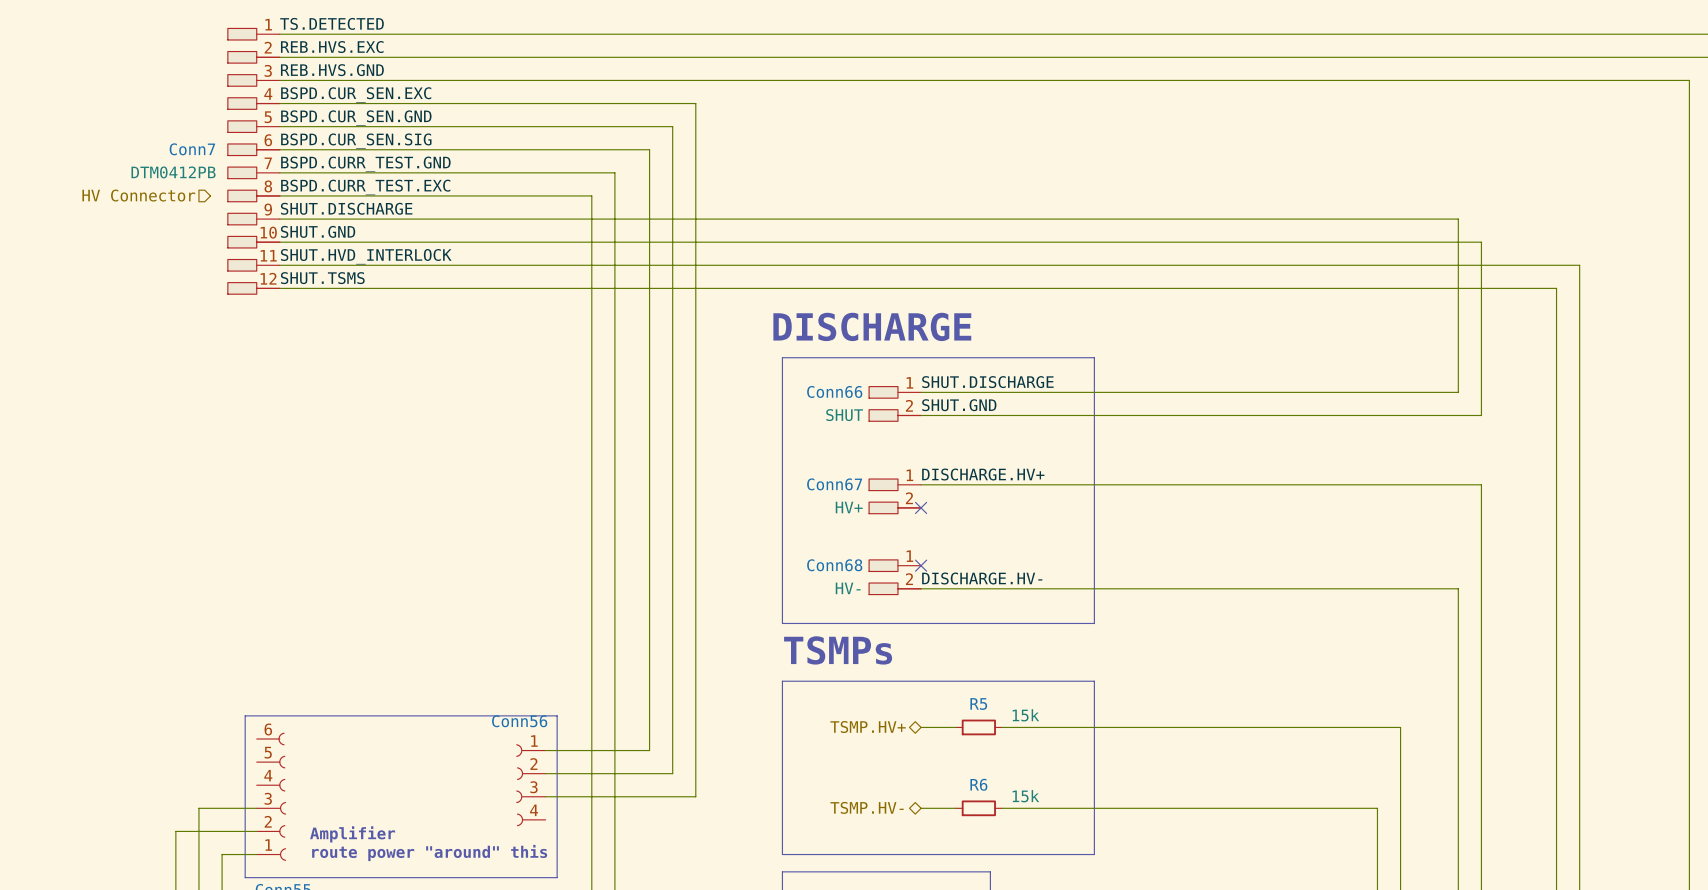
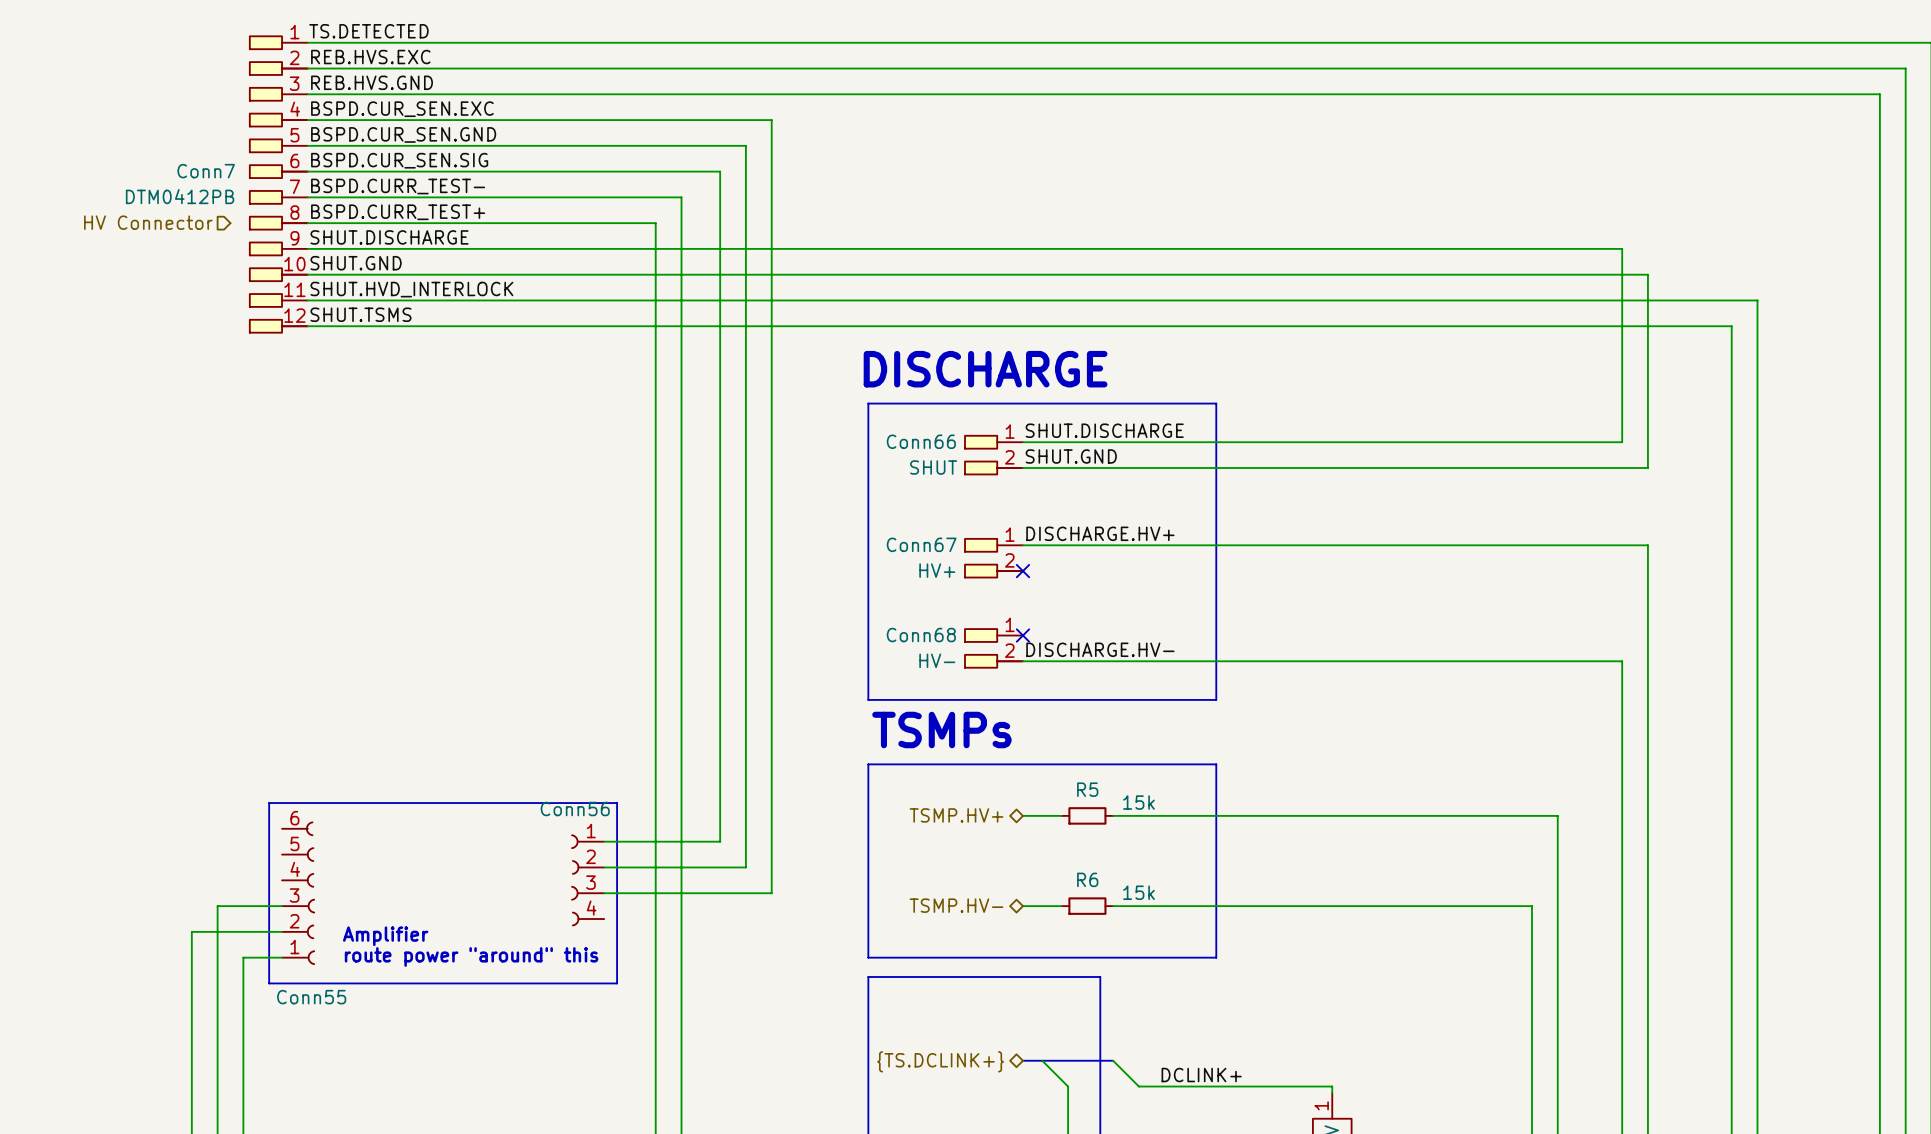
label: BSPD.CURR_TEST.GND (365, 164) -> BSPD.CURR_TEST- (398, 186)
label: BSPD.CURR_TEST.EXC (365, 187) -> BSPD.CURR_TEST+ (398, 212)

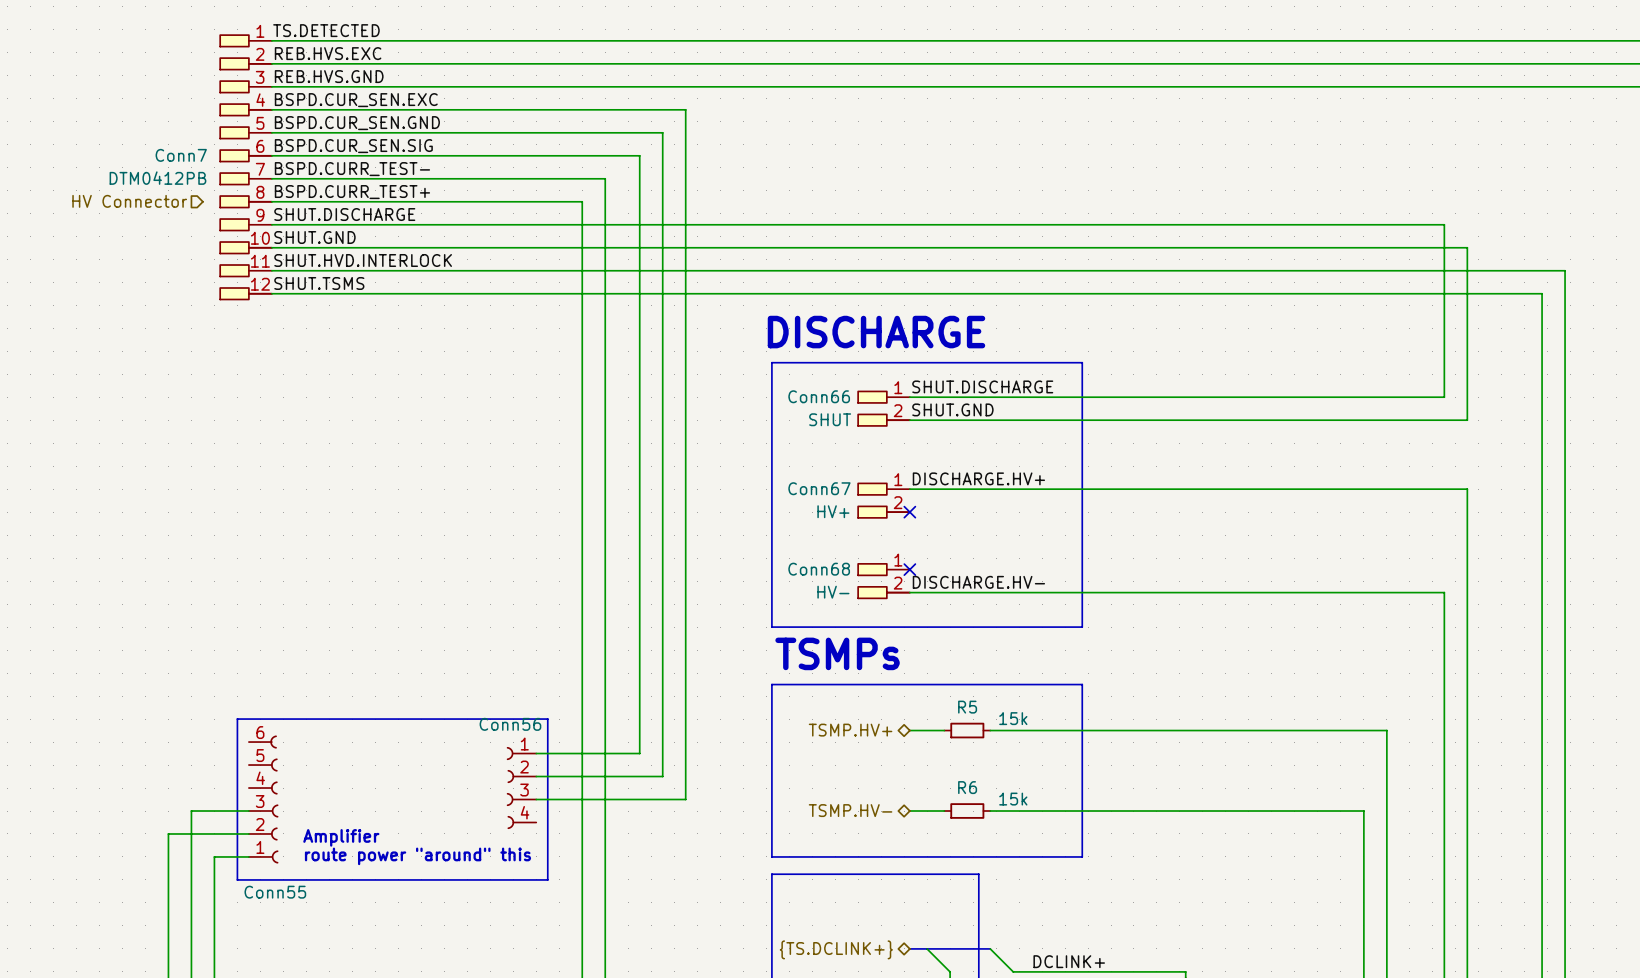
label: SHUT.HVD_INTERLOCK (411, 289) -> SHUT.HVD.INTERLOCK (363, 260)

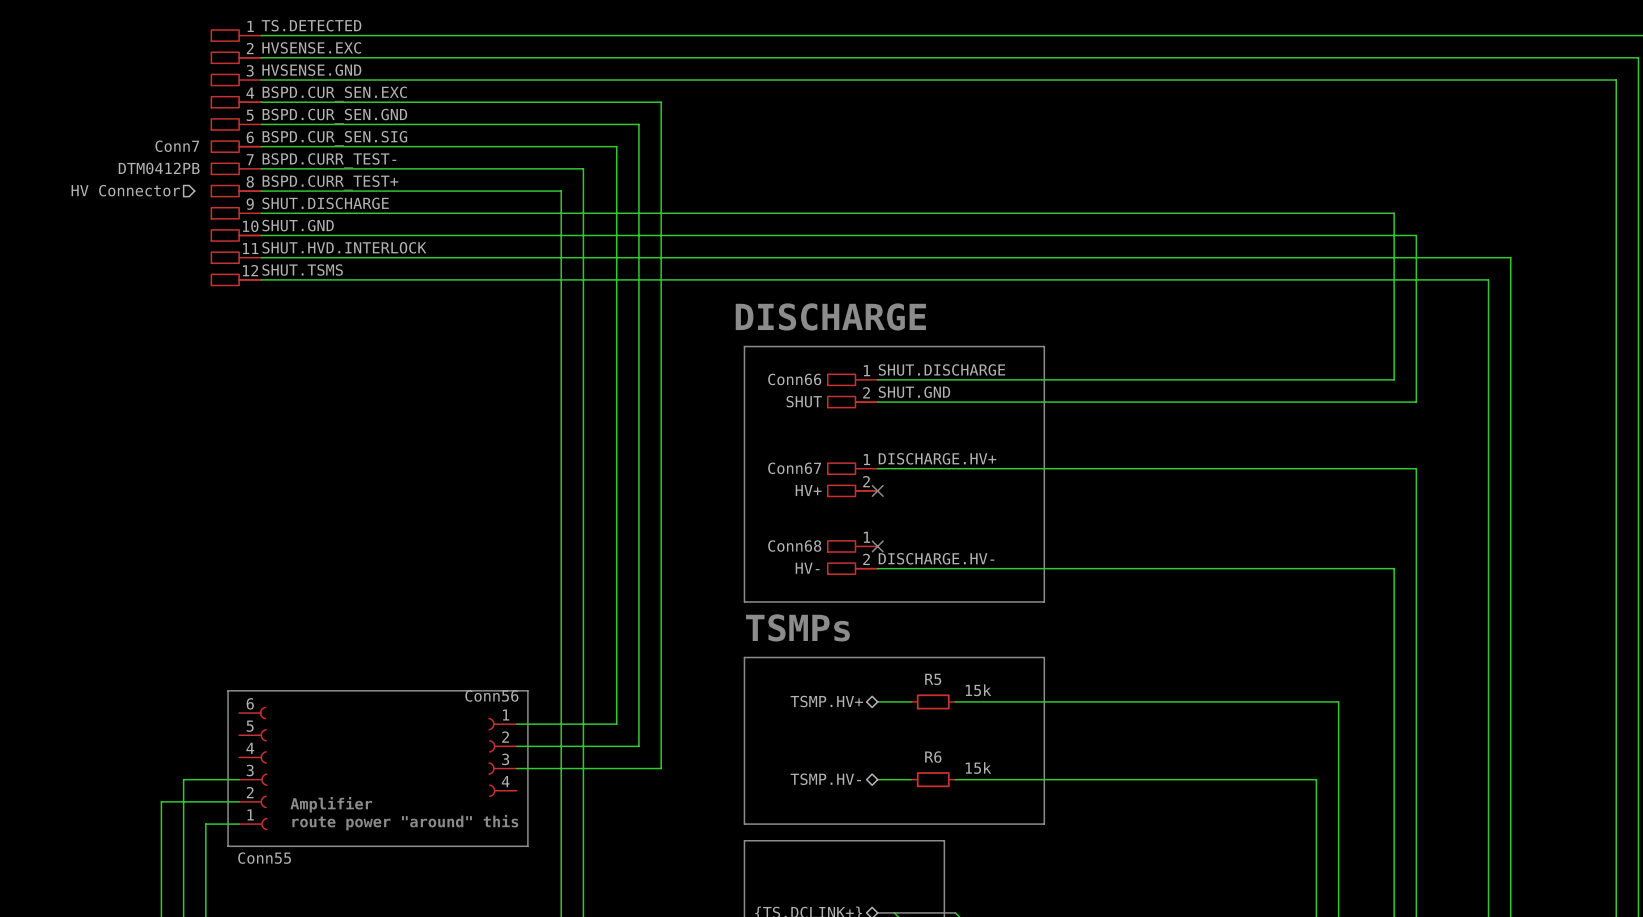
label: REB.HVS.EXC (328, 53) -> HVSENSE.EXC (311, 47)
label: REB.HVS.GND (329, 76) -> HVSENSE.GND (311, 70)

